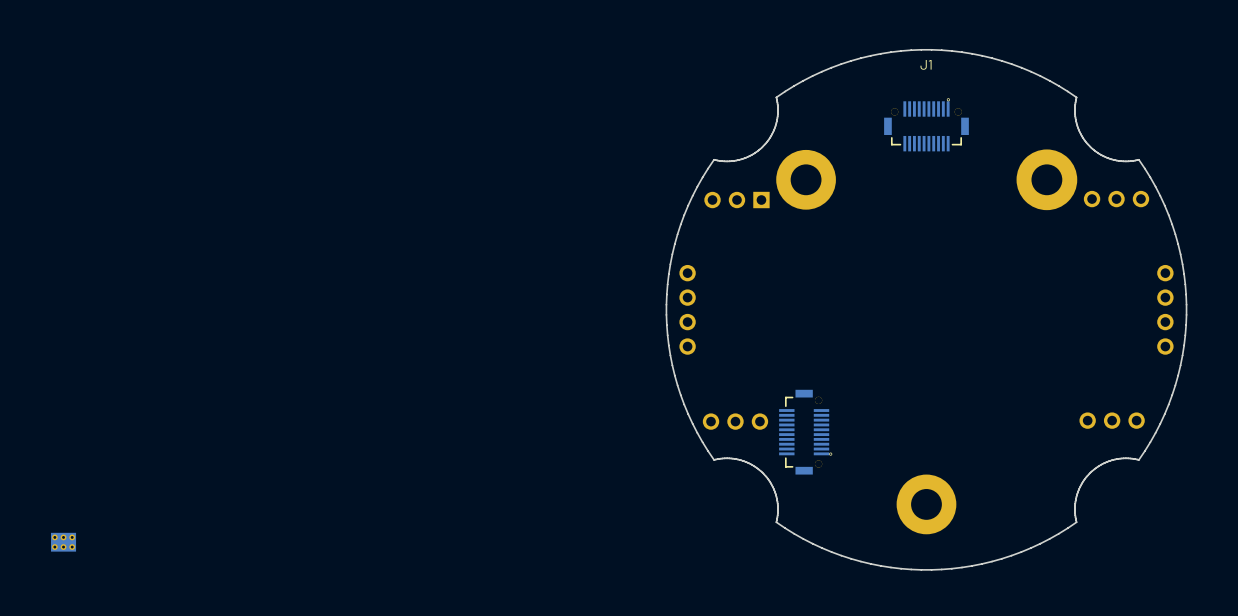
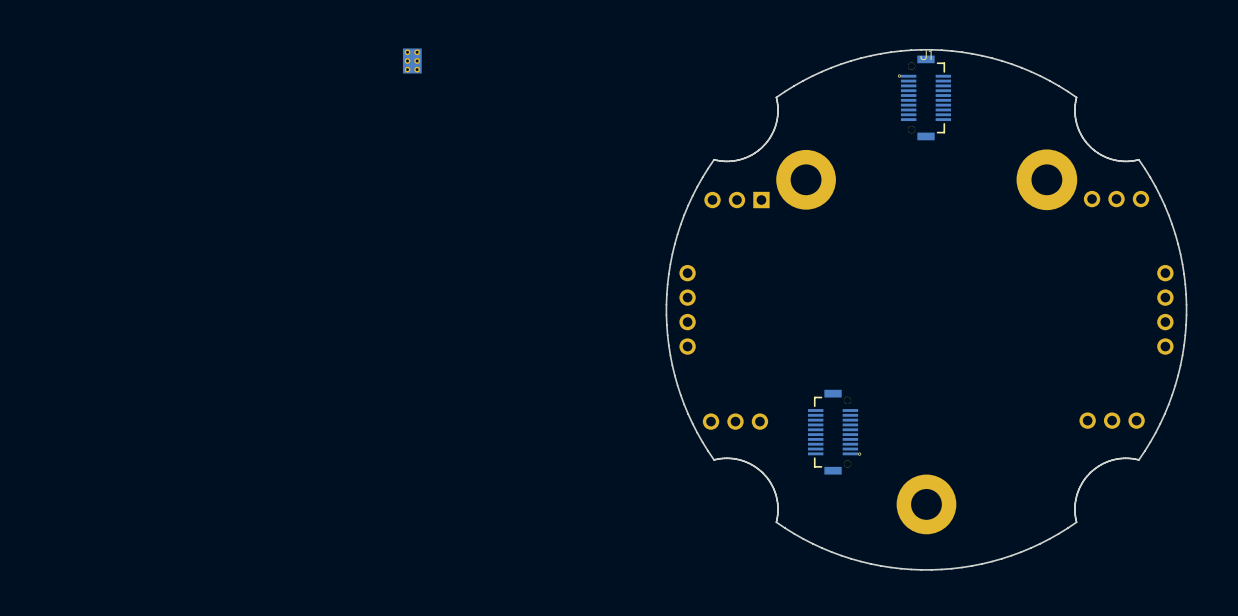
part: none -> (412, 60)
J1 footprint: [779, 98, 969, 475] -> [808, 55, 952, 475]
part: (63, 542) -> none

